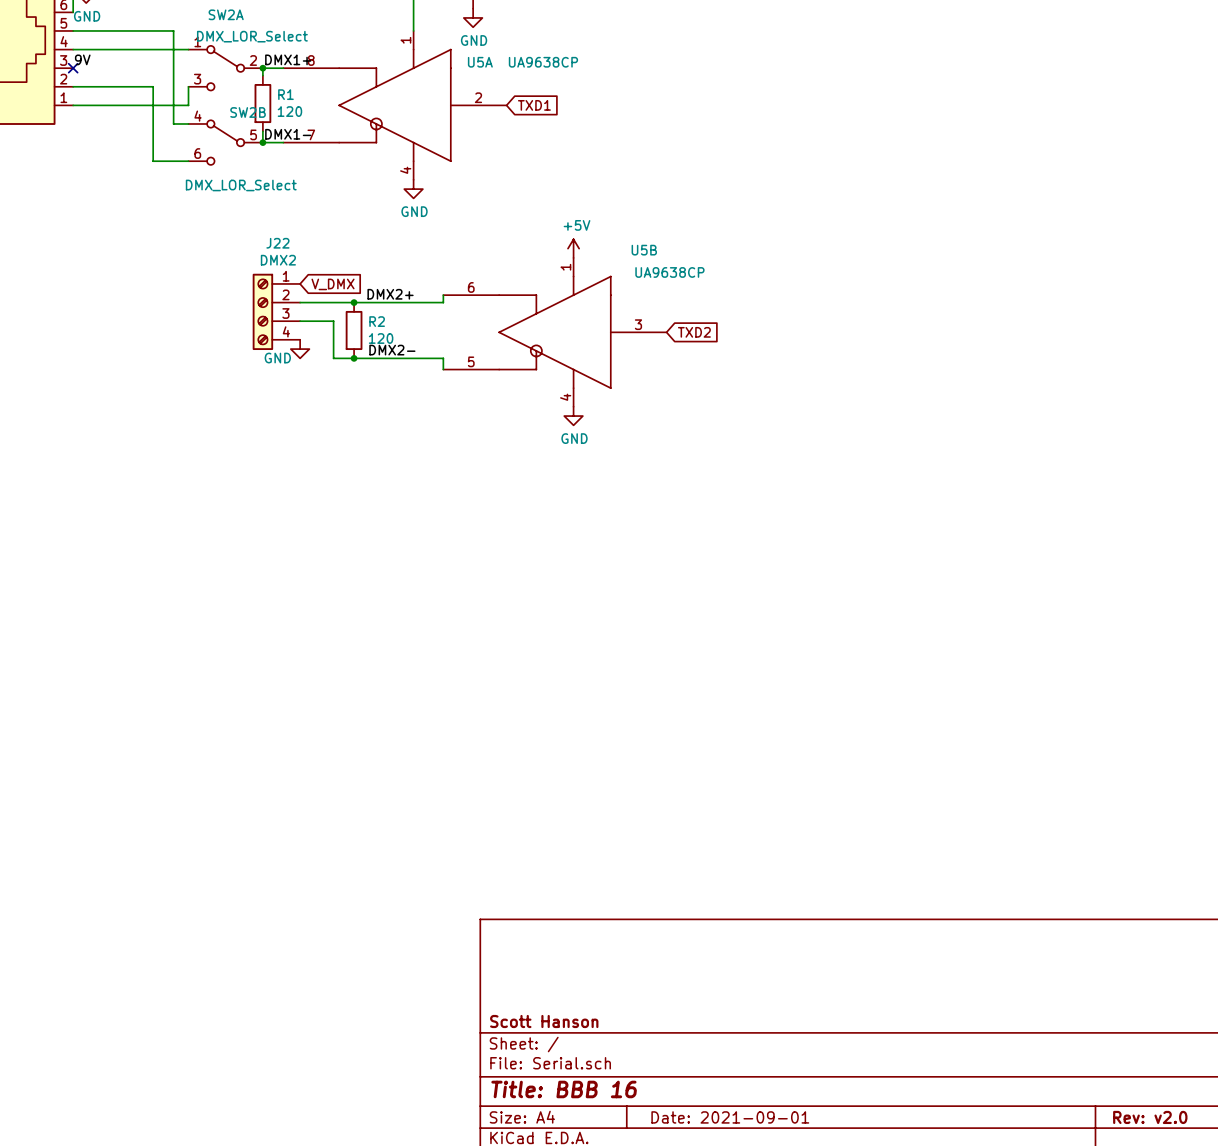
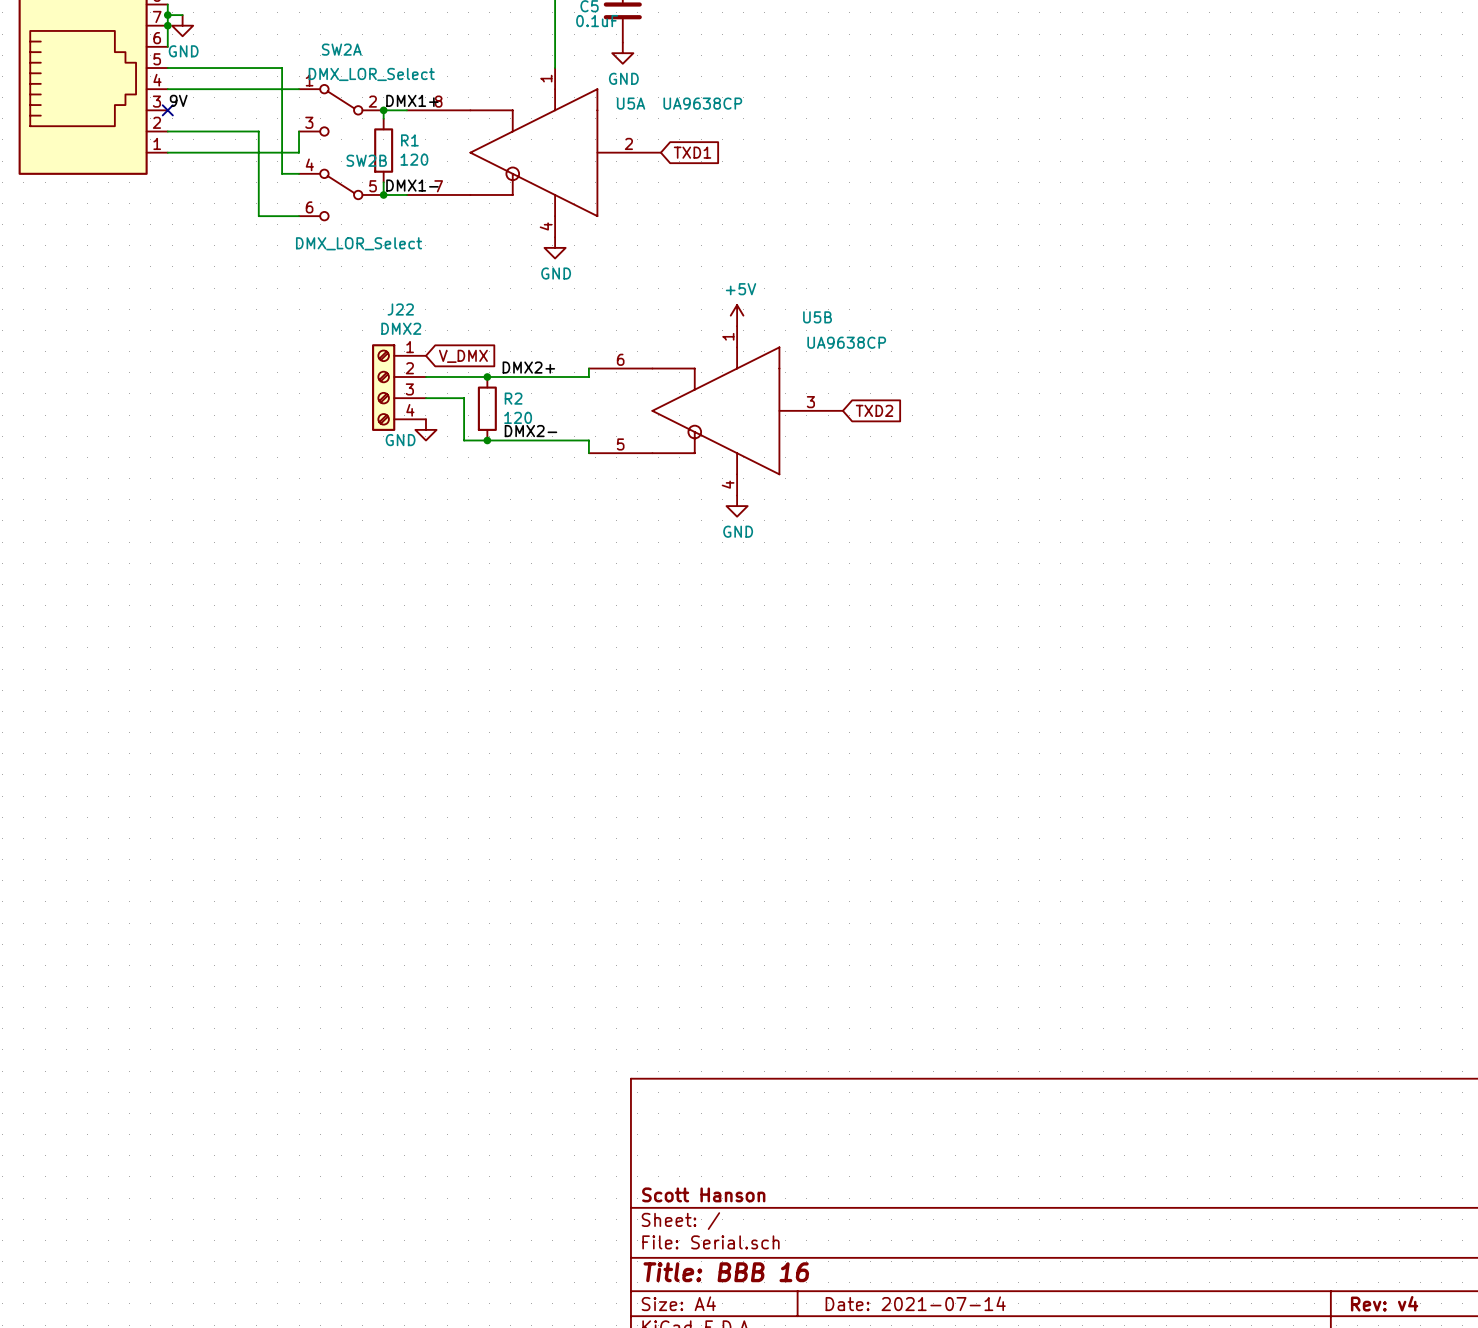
title block: Date: 2021-09-01 (730, 1117) -> Date: 2021-07-14 (915, 1303)
title block: Rev: v2.0 (1150, 1117) -> Rev: v4 (1384, 1303)

